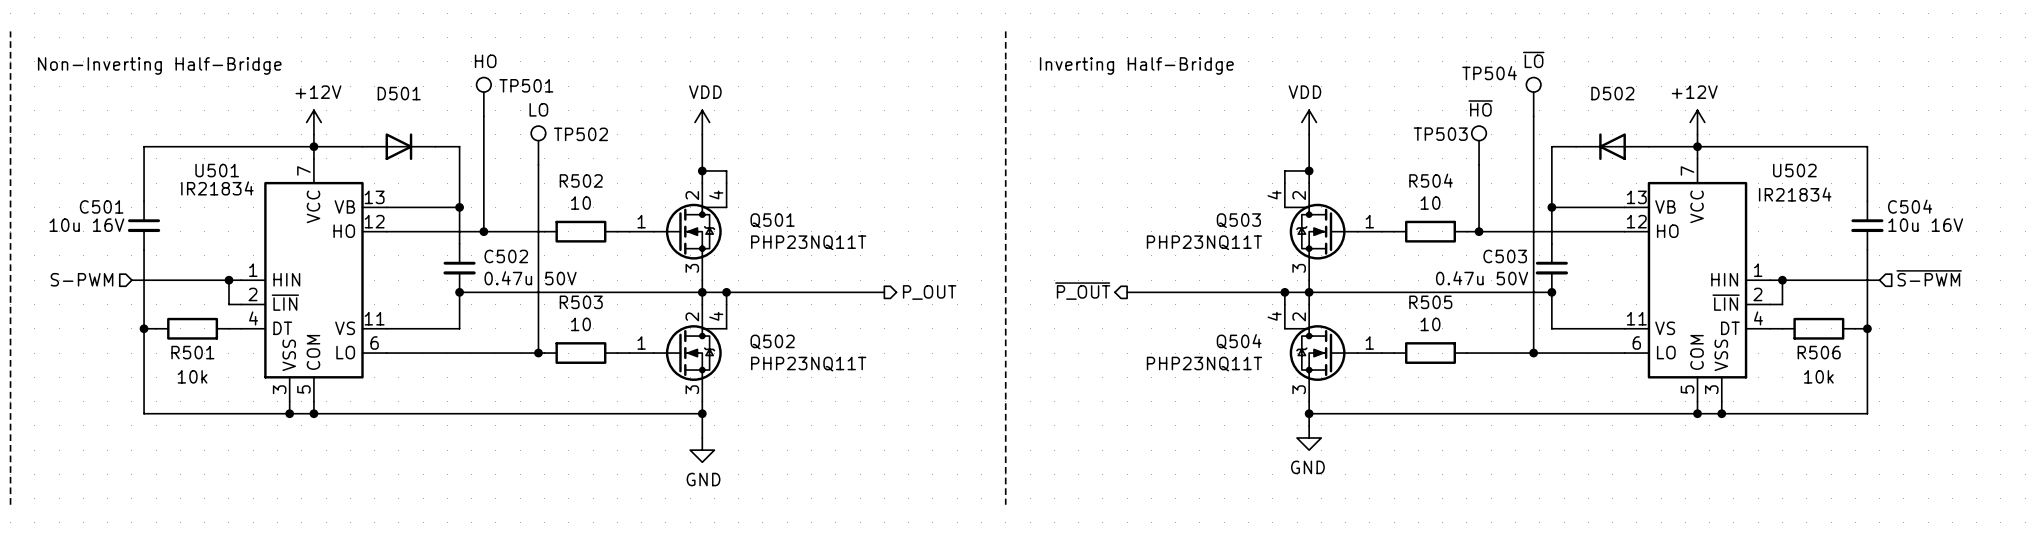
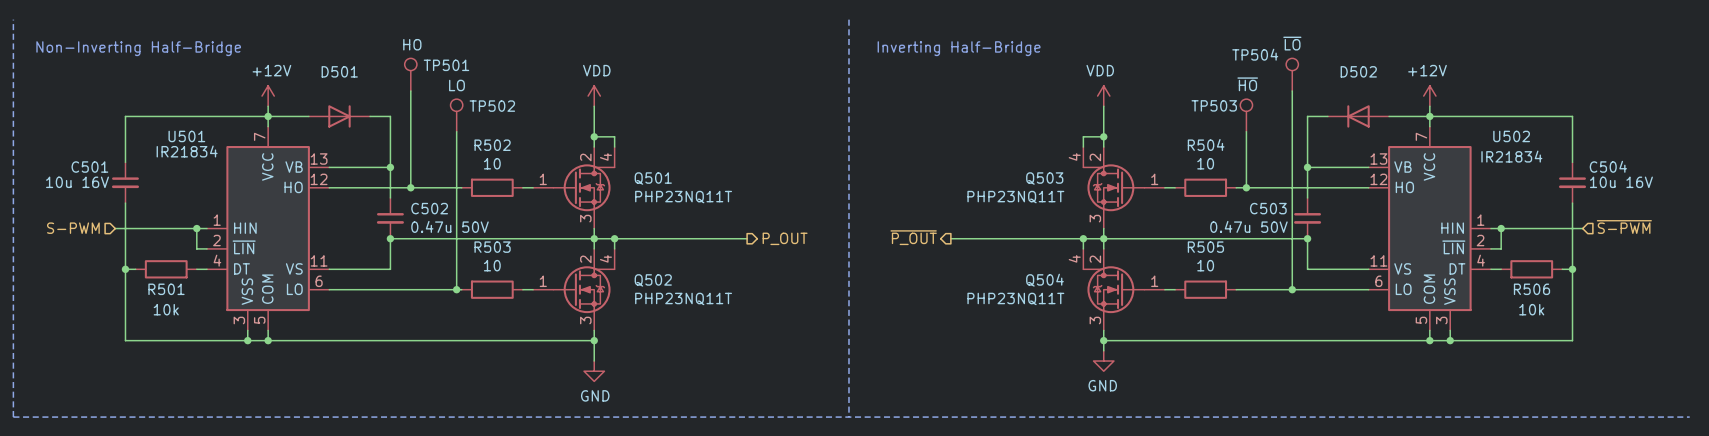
line: none -> (13, 417) (1689, 417)

